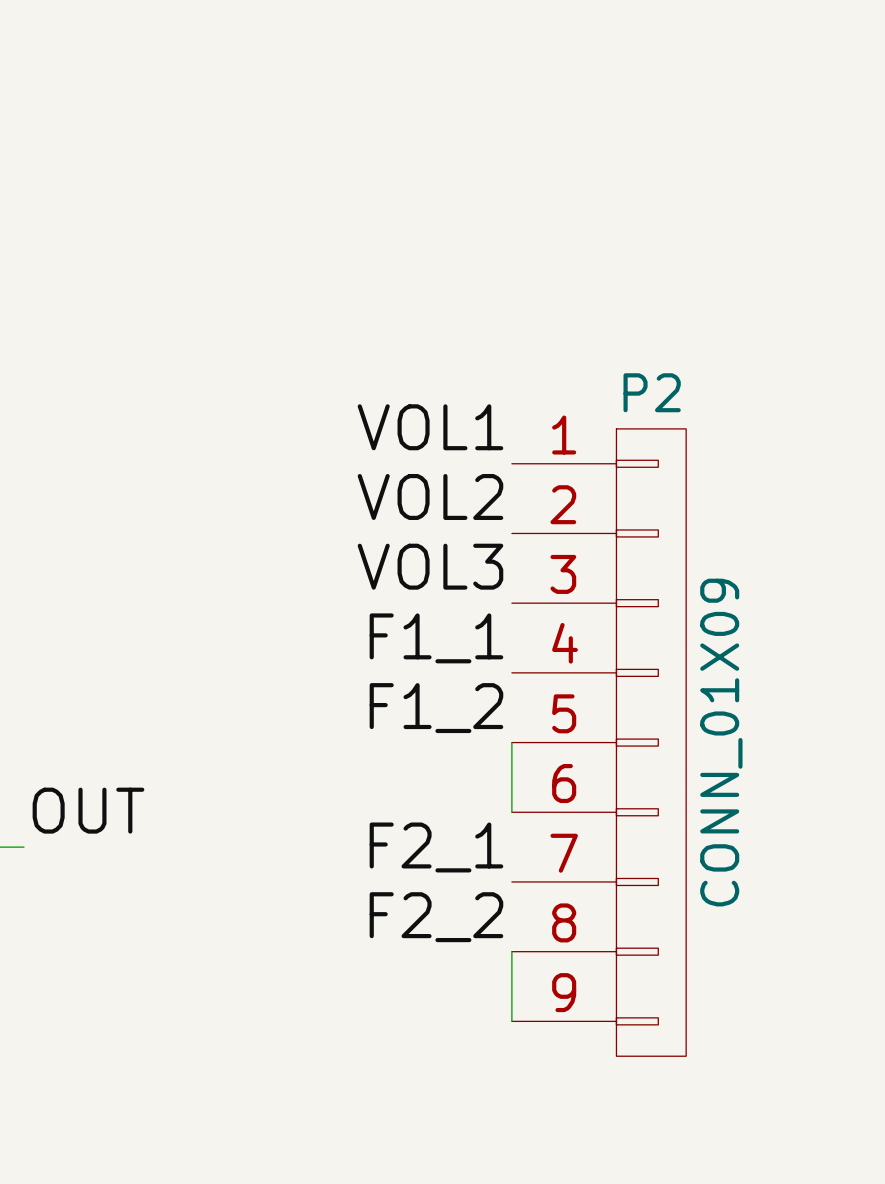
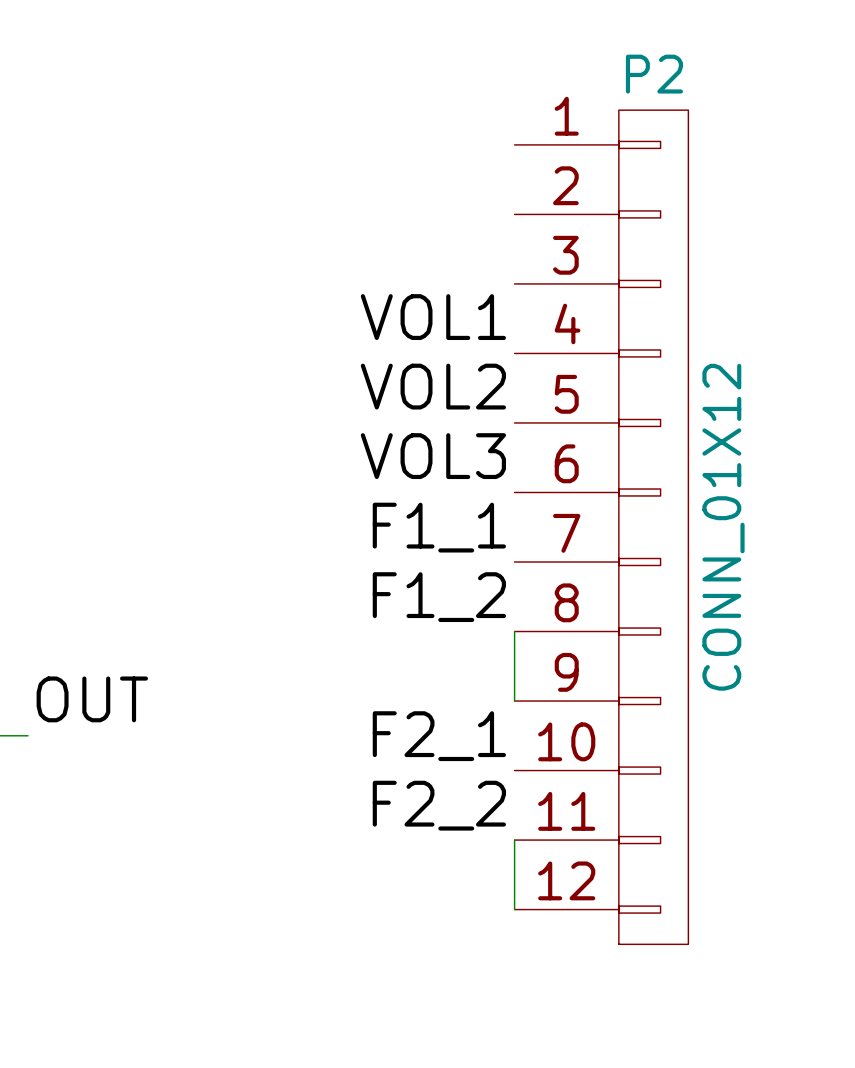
P2 name position: P2 (652, 392) -> P2 (654, 74)
P2 symbol: [511, 428, 687, 1057] -> [514, 110, 689, 945]
P2 value: CONN_01X09 (721, 742) -> CONN_01X12 (723, 527)

